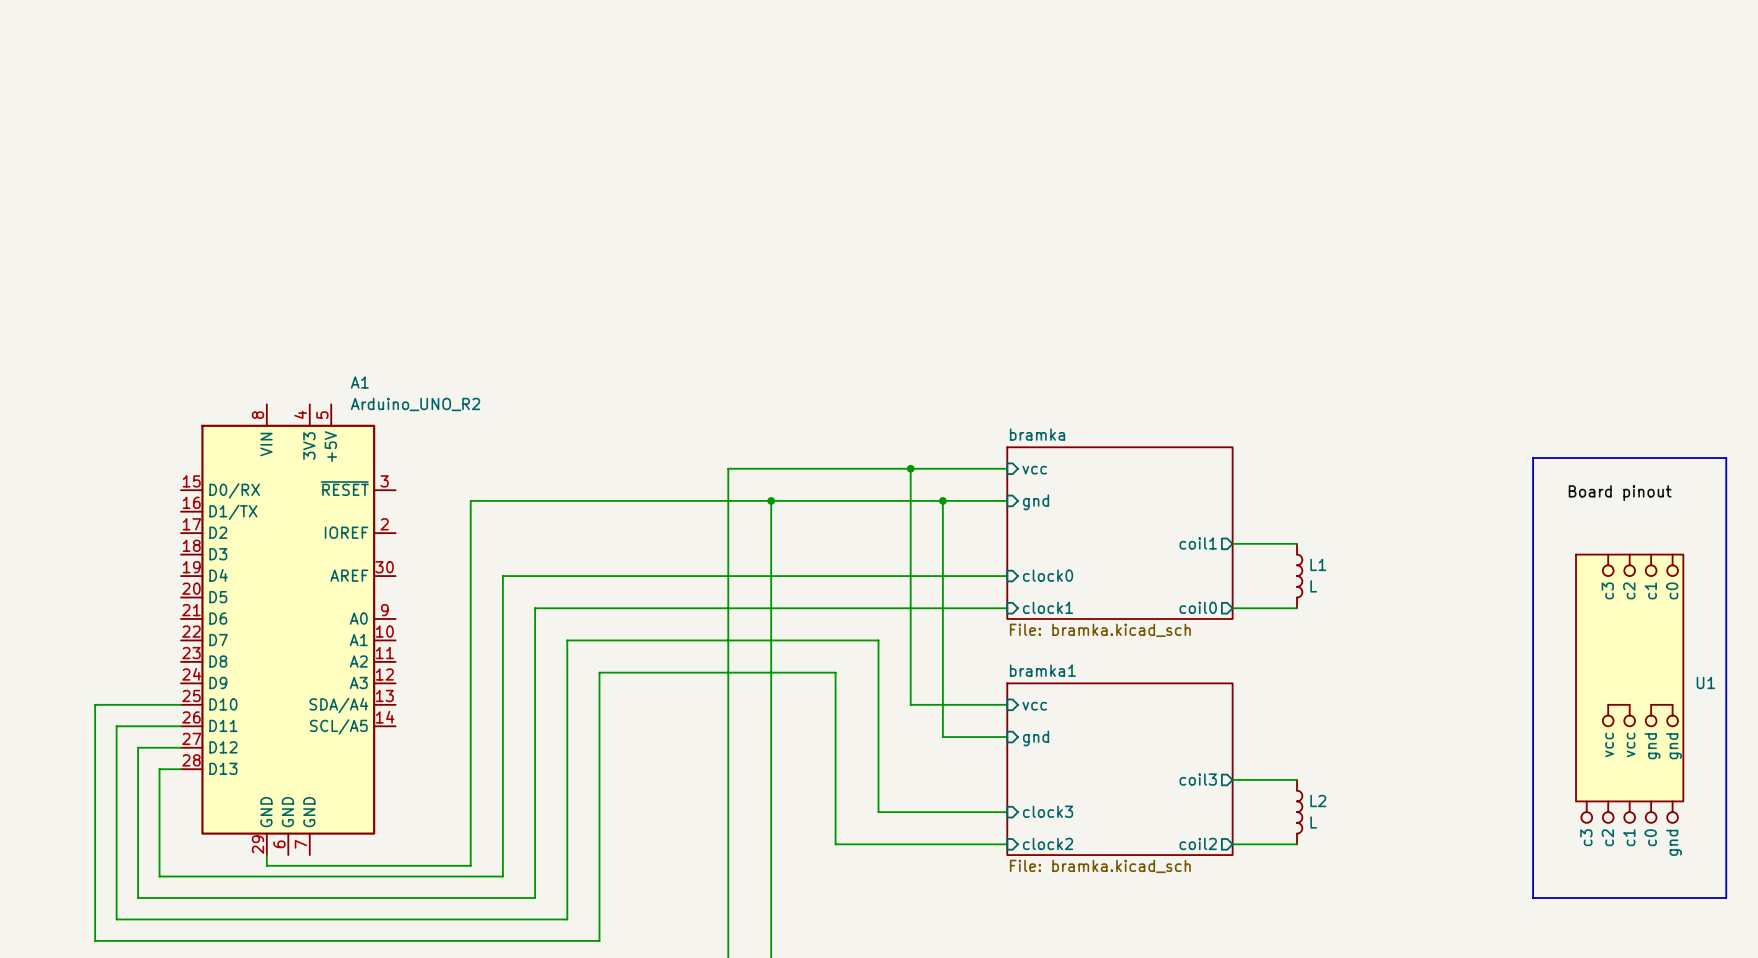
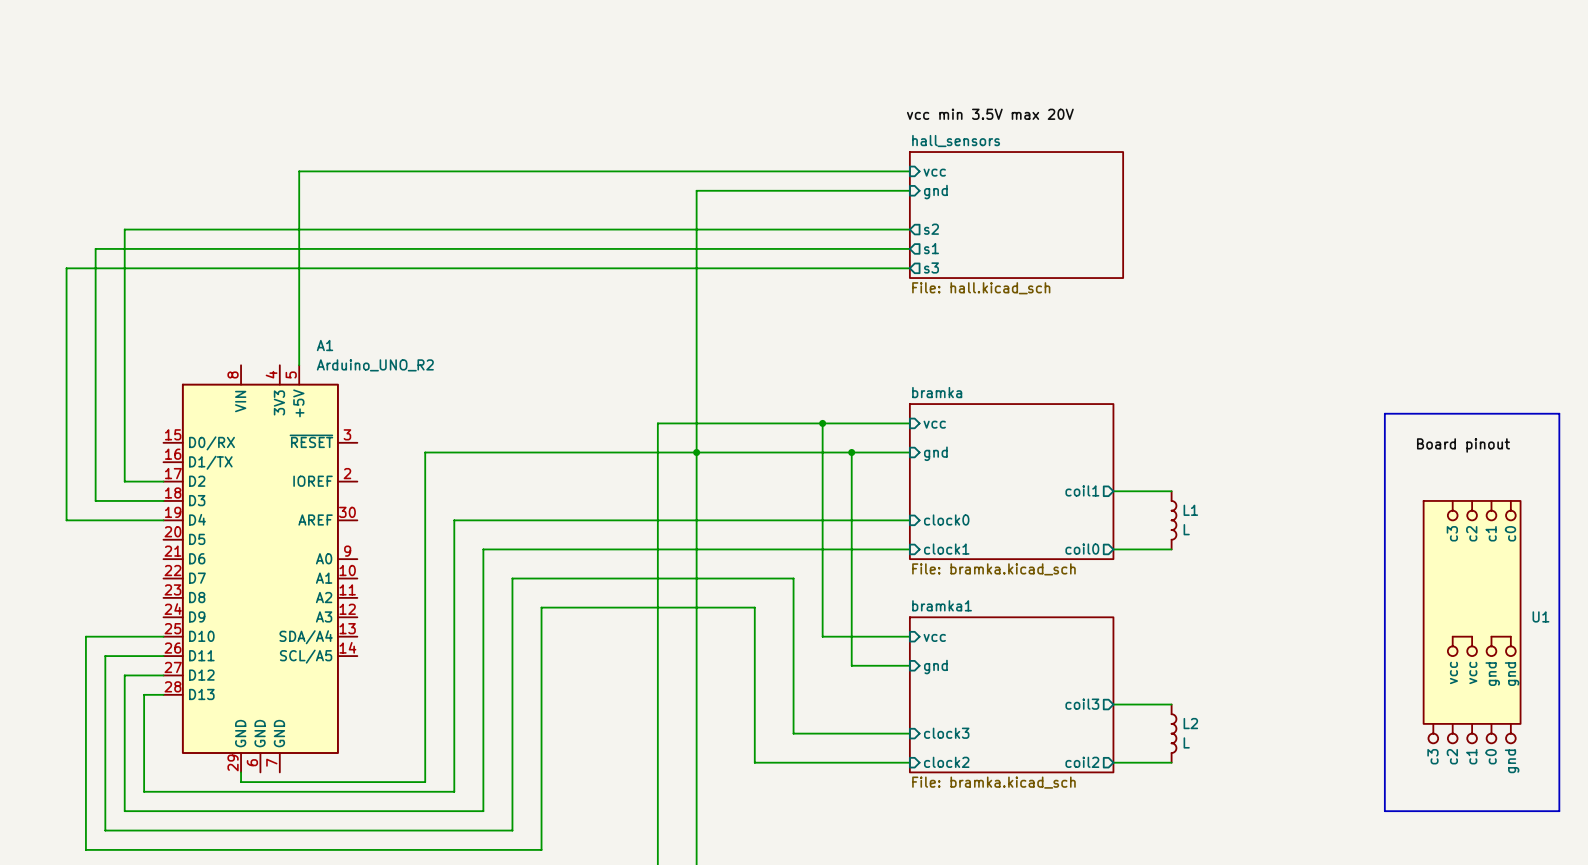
label: none -> vcc min 3.5V max 20V (990, 114)
wire: none -> (909, 171) (299, 171) (299, 365)
sheet pin: none -> vcc (934, 172)
wire: none -> (909, 190) (696, 190) (696, 452)
sheet pin: none -> gnd (935, 192)
sheet hall_sensors: none -> File: hall.kicad_sch (1016, 215)
sheet pin: none -> s2 (931, 229)
wire: none -> (909, 229) (124, 229) (124, 481) (163, 481)
wire: none -> (909, 248) (95, 248) (95, 500) (163, 500)
sheet pin: none -> s1 (931, 248)
sheet pin: none -> s3 (931, 267)
wire: none -> (909, 268) (66, 268) (66, 520) (163, 520)

